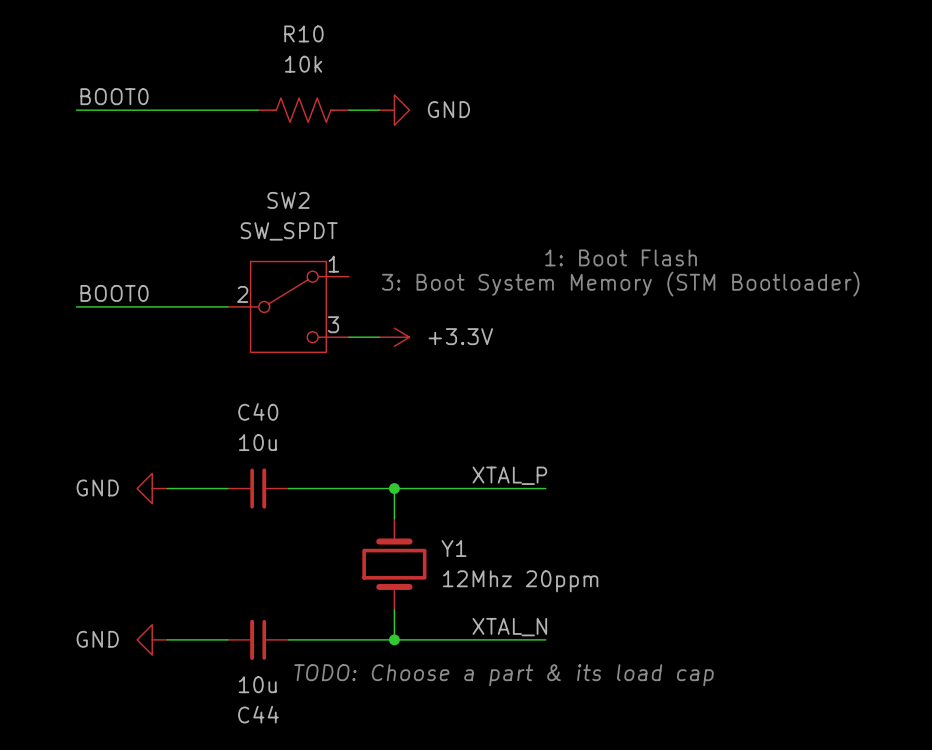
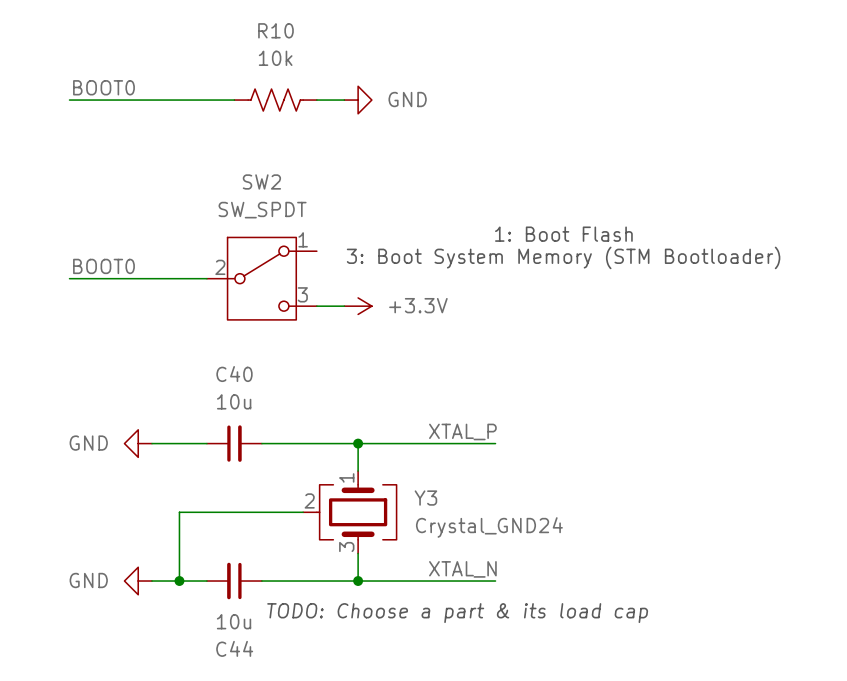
wire: none -> (303, 512) (179, 512) (179, 581)
Y3: none -> Crystal_GND24 (349, 512)
Y1: 12Mhz 20ppm (394, 564) -> none
junction: none -> (179, 581)

